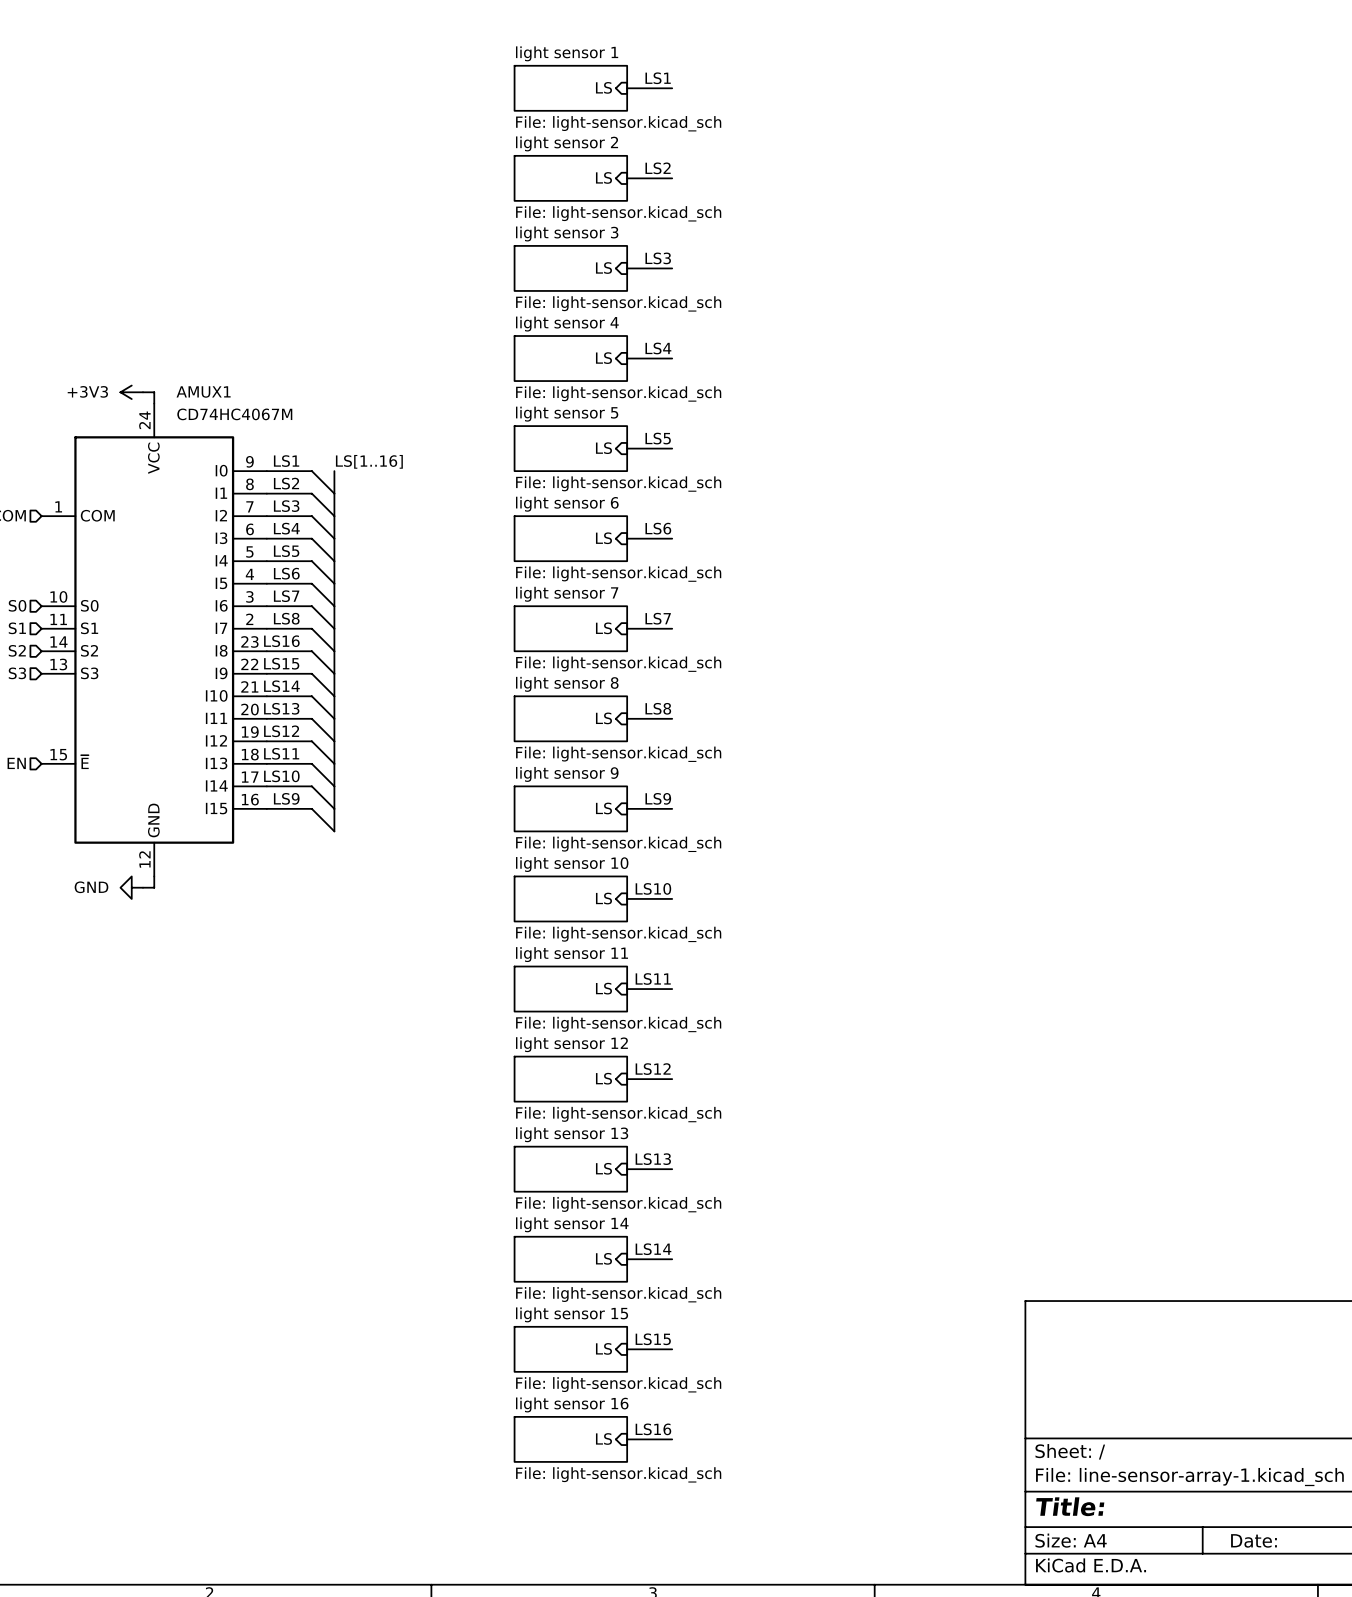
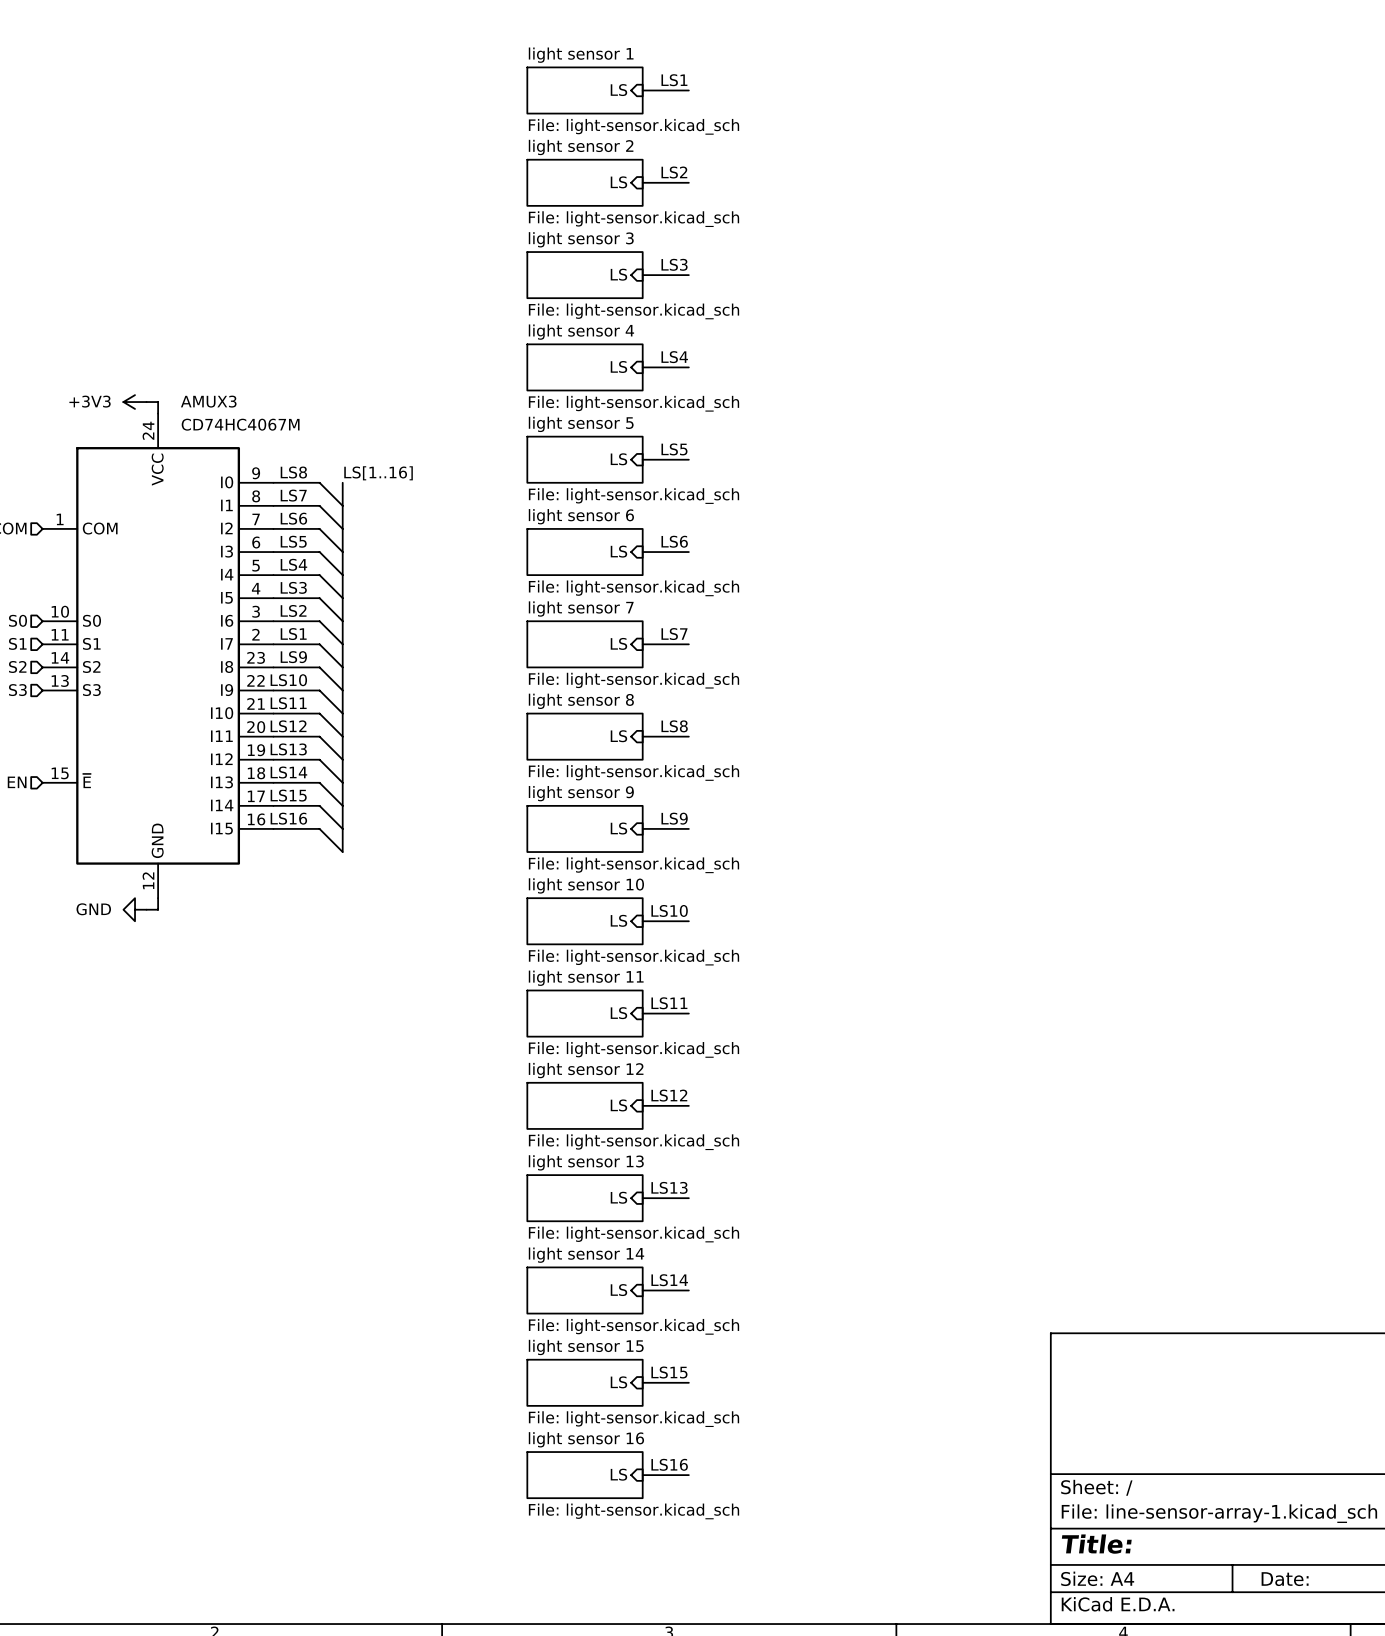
AMUX1 name: AMUX1 (203, 391) -> AMUX3 (208, 401)
label: LS1 (286, 461) -> LS8 (293, 472)
label: LS2 (286, 483) -> LS7 (293, 495)
label: LS3 (286, 506) -> LS6 (293, 518)
label: LS4 (286, 528) -> LS5 (293, 541)
label: LS5 (286, 551) -> LS4 (293, 564)
label: LS6 (286, 573) -> LS3 (293, 587)
label: LS7 (286, 596) -> LS2 (293, 610)
label: LS8 (286, 618) -> LS1 (293, 634)
label: LS16 (281, 641) -> LS9 (293, 657)
label: LS15 (281, 663) -> LS10 (288, 680)
label: LS14 (281, 686) -> LS11 (288, 703)
label: LS13 (281, 708) -> LS12 (288, 726)
label: LS12 (281, 731) -> LS13 (288, 749)
label: LS11 (281, 753) -> LS14 (288, 772)
label: LS10 (281, 776) -> LS15 (288, 795)
label: LS9 (286, 798) -> LS16 (288, 818)

